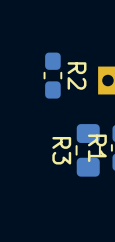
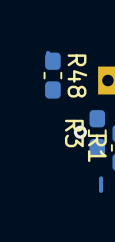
R2 name: R2 (77, 75) -> R48 (77, 75)
R3 footprint: [75, 124, 101, 177] -> [87, 110, 107, 157]
via: none -> (80, 132)
track: none -> (101, 178) (101, 190)

